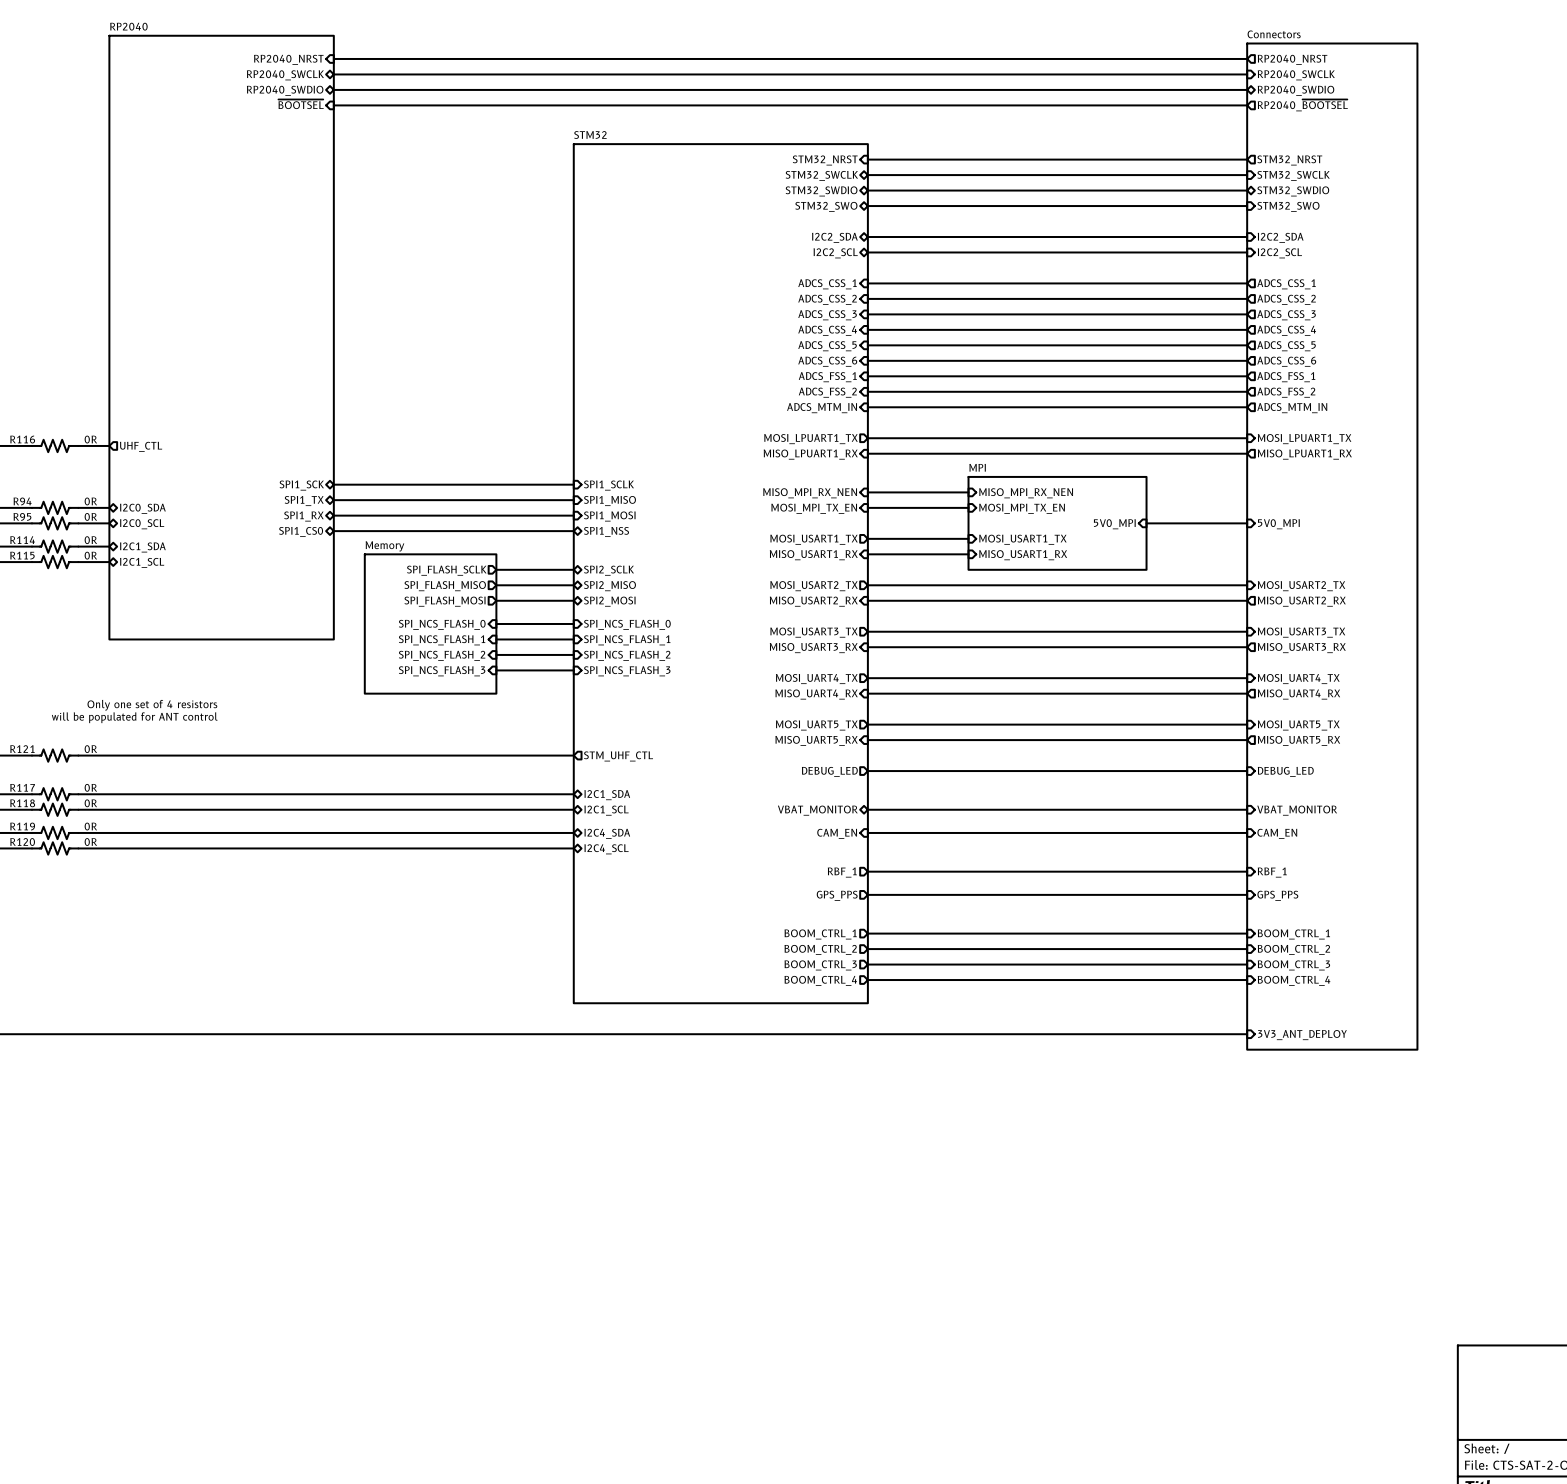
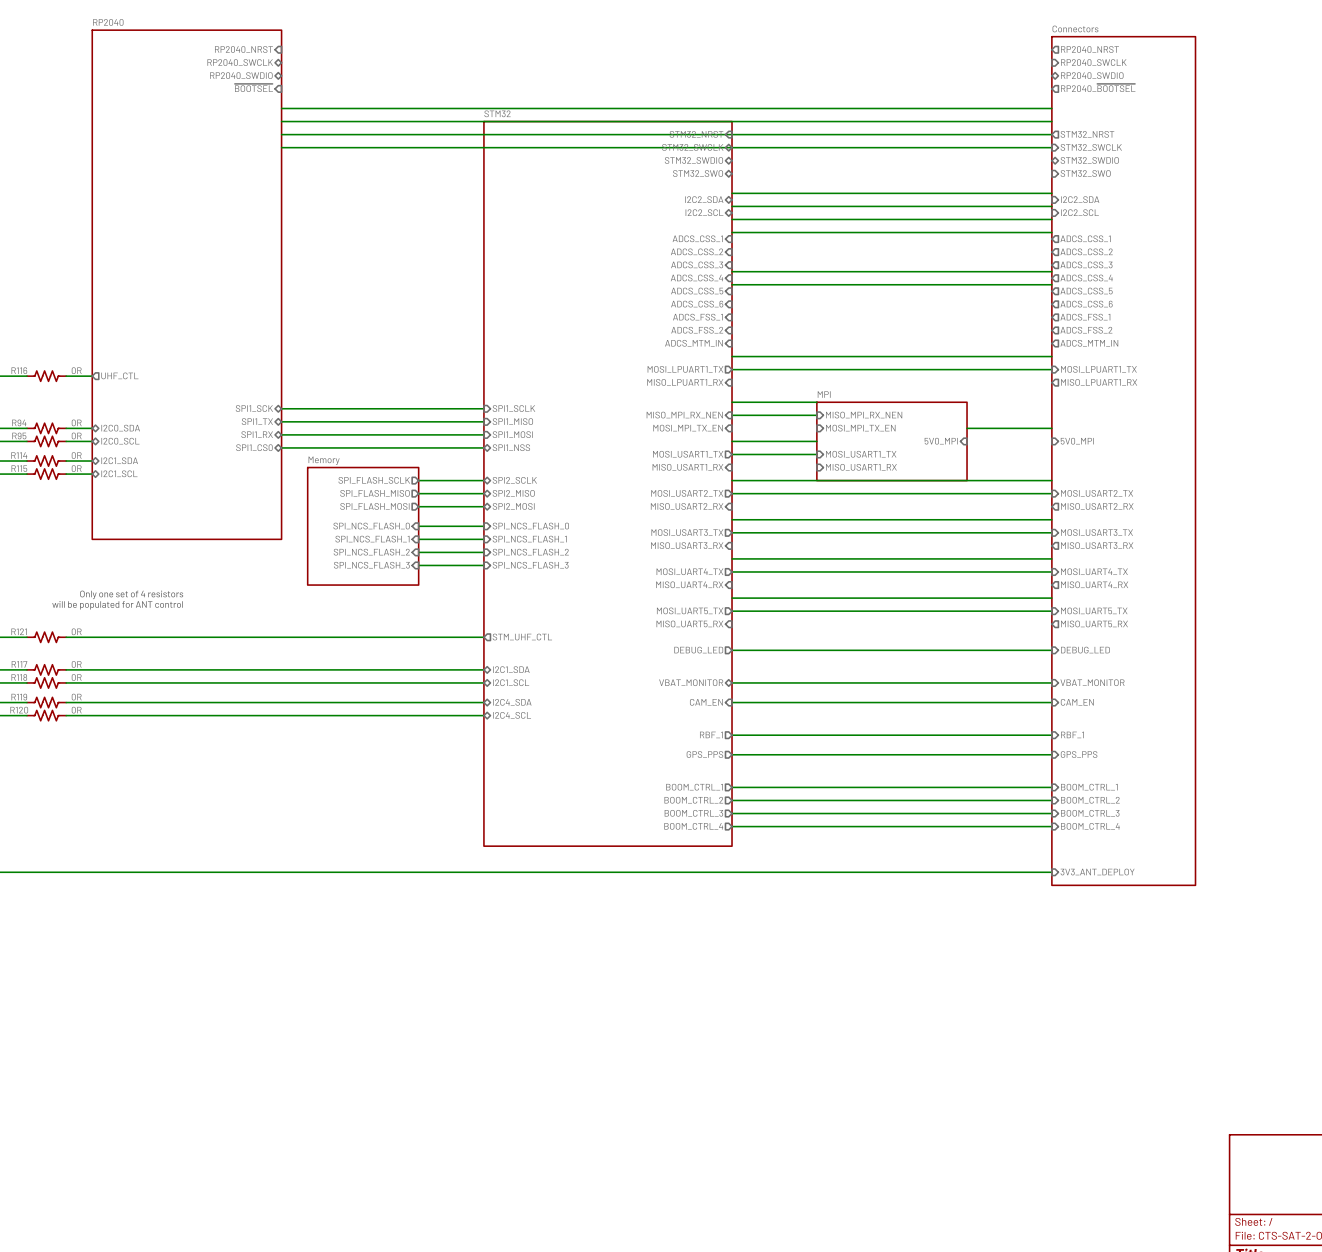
wire: (333, 58) (1247, 58) -> none
wire: (333, 74) (1247, 74) -> none
wire: (333, 89) (1247, 89) -> (281, 108) (1051, 108)
wire: (333, 105) (1247, 105) -> (281, 121) (1051, 121)
wire: none -> (281, 134) (732, 134)
wire: none -> (281, 147) (732, 147)
wire: (867, 190) (1247, 190) -> (732, 193) (1051, 193)
wire: (867, 206) (1247, 206) -> (732, 206) (1051, 206)
wire: (867, 236) (1247, 236) -> (732, 232) (1051, 232)
wire: (867, 252) (1247, 252) -> none
wire: (867, 283) (1247, 283) -> (732, 271) (1051, 271)
wire: (867, 298) (1247, 298) -> (732, 284) (1051, 284)
wire: (867, 314) (1247, 314) -> (732, 219) (1051, 219)
wire: (867, 329) (1247, 329) -> none
wire: (867, 345) (1247, 345) -> none
wire: (867, 360) (1247, 360) -> none
wire: (867, 376) (1247, 376) -> none
wire: (867, 391) (1247, 391) -> none
wire: (867, 407) (1247, 407) -> none
wire: (867, 453) (1247, 453) -> (732, 356) (1051, 356)
wire: (867, 507) (968, 507) -> (732, 402) (816, 402)
wire: (1146, 523) (1247, 523) -> (967, 428) (1051, 428)
wire: (867, 554) (968, 554) -> (732, 441) (816, 441)
wire: (867, 600) (1247, 600) -> (732, 480) (1051, 480)
wire: (867, 647) (1247, 647) -> (732, 519) (1051, 519)
wire: (867, 693) (1247, 693) -> (732, 558) (1051, 558)
wire: (867, 740) (1247, 740) -> (732, 598) (1051, 598)

